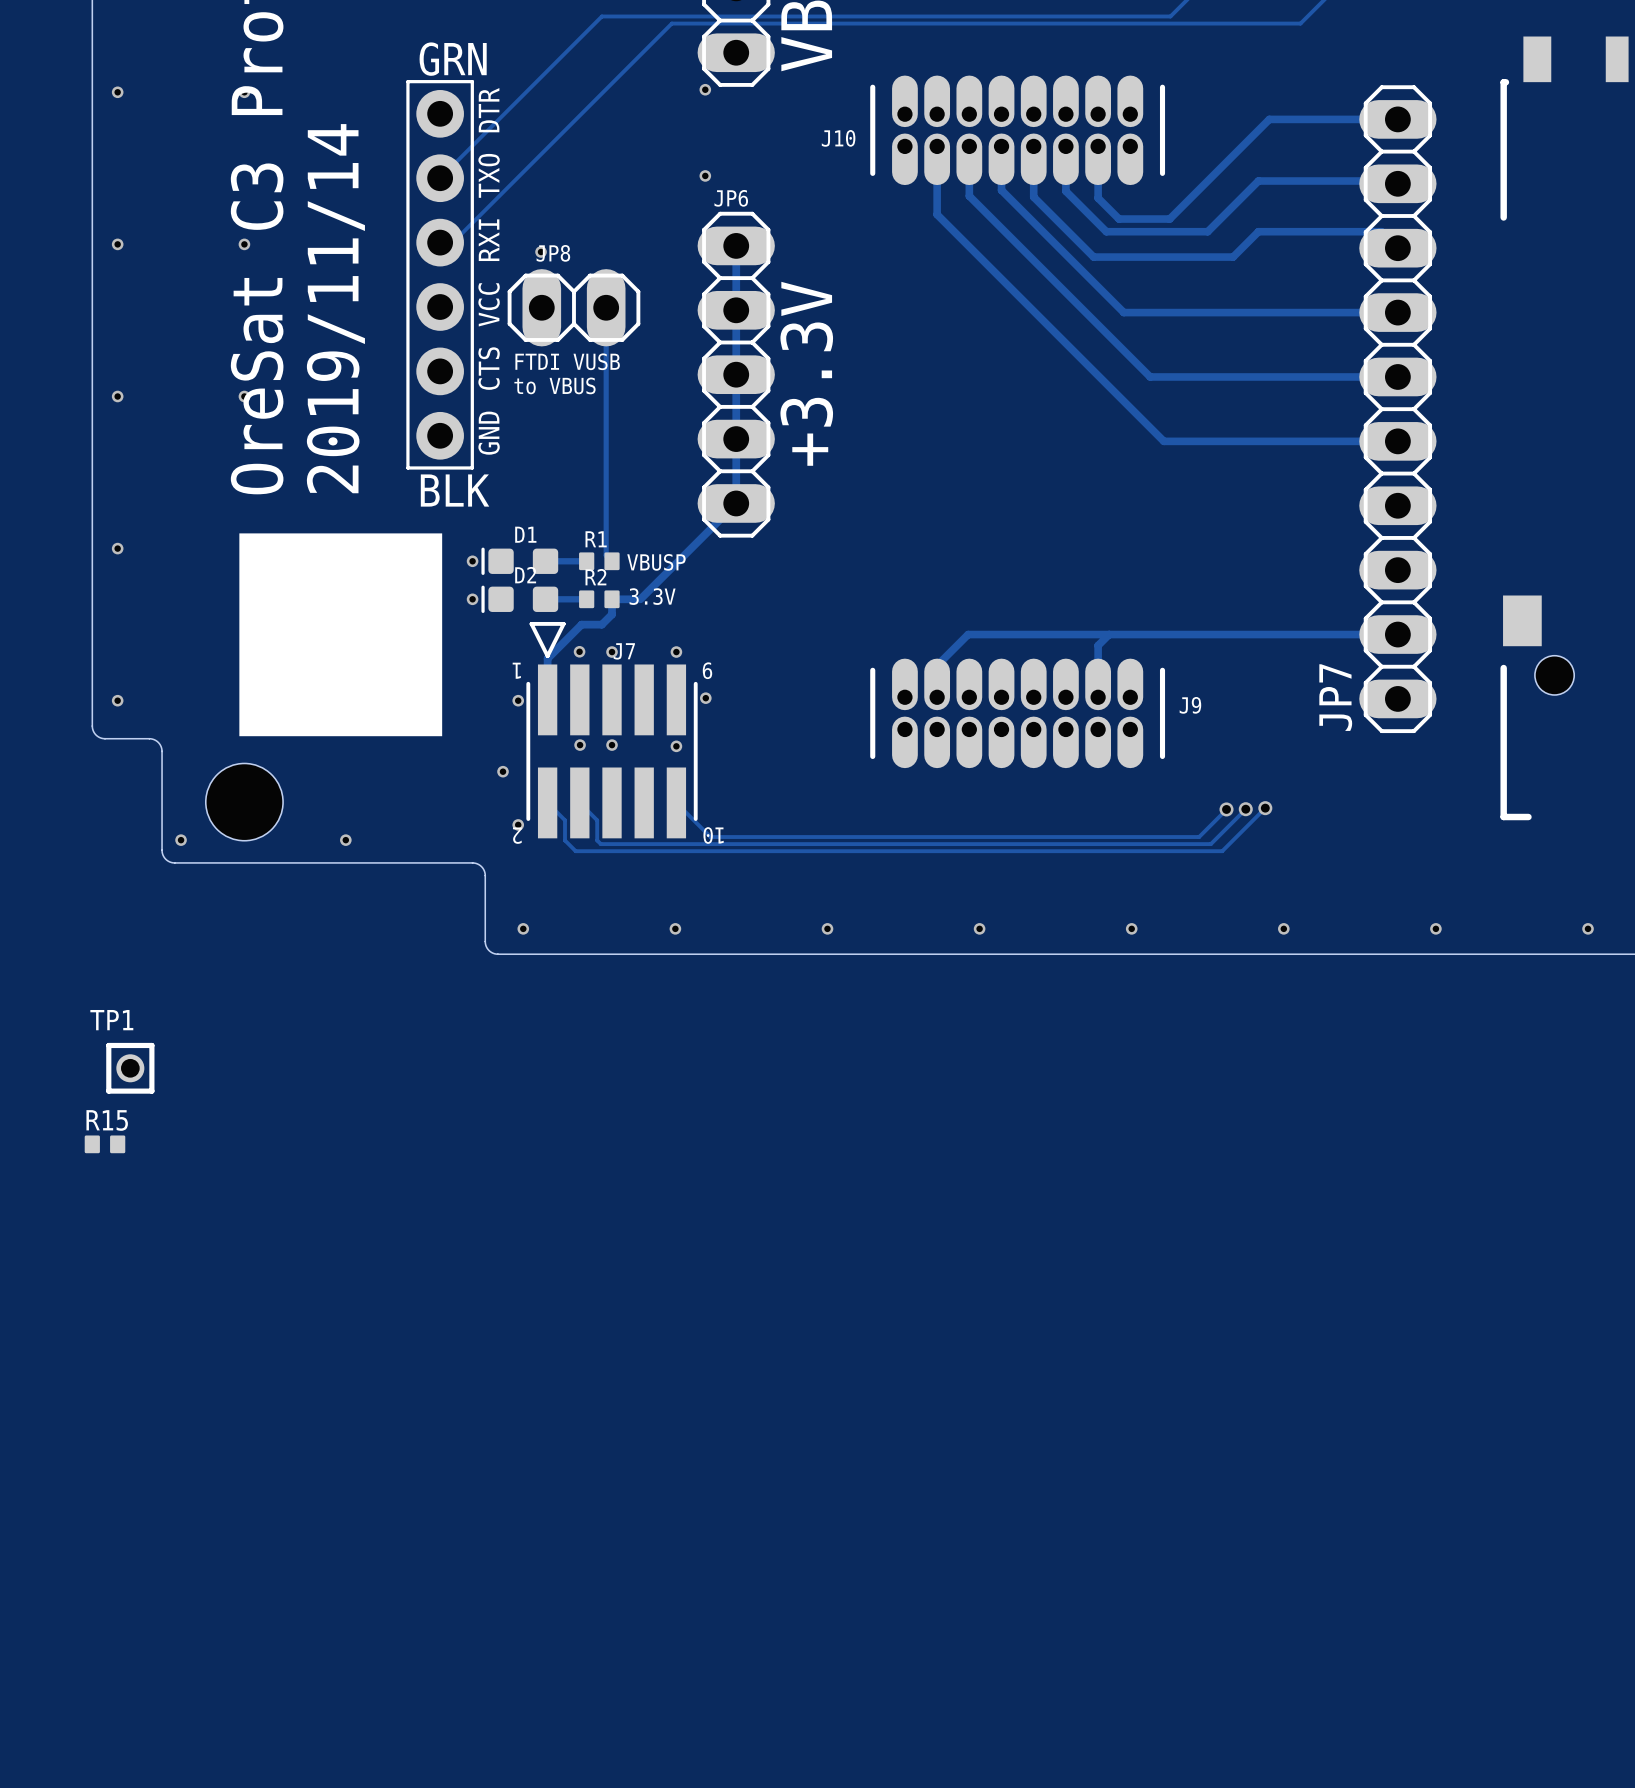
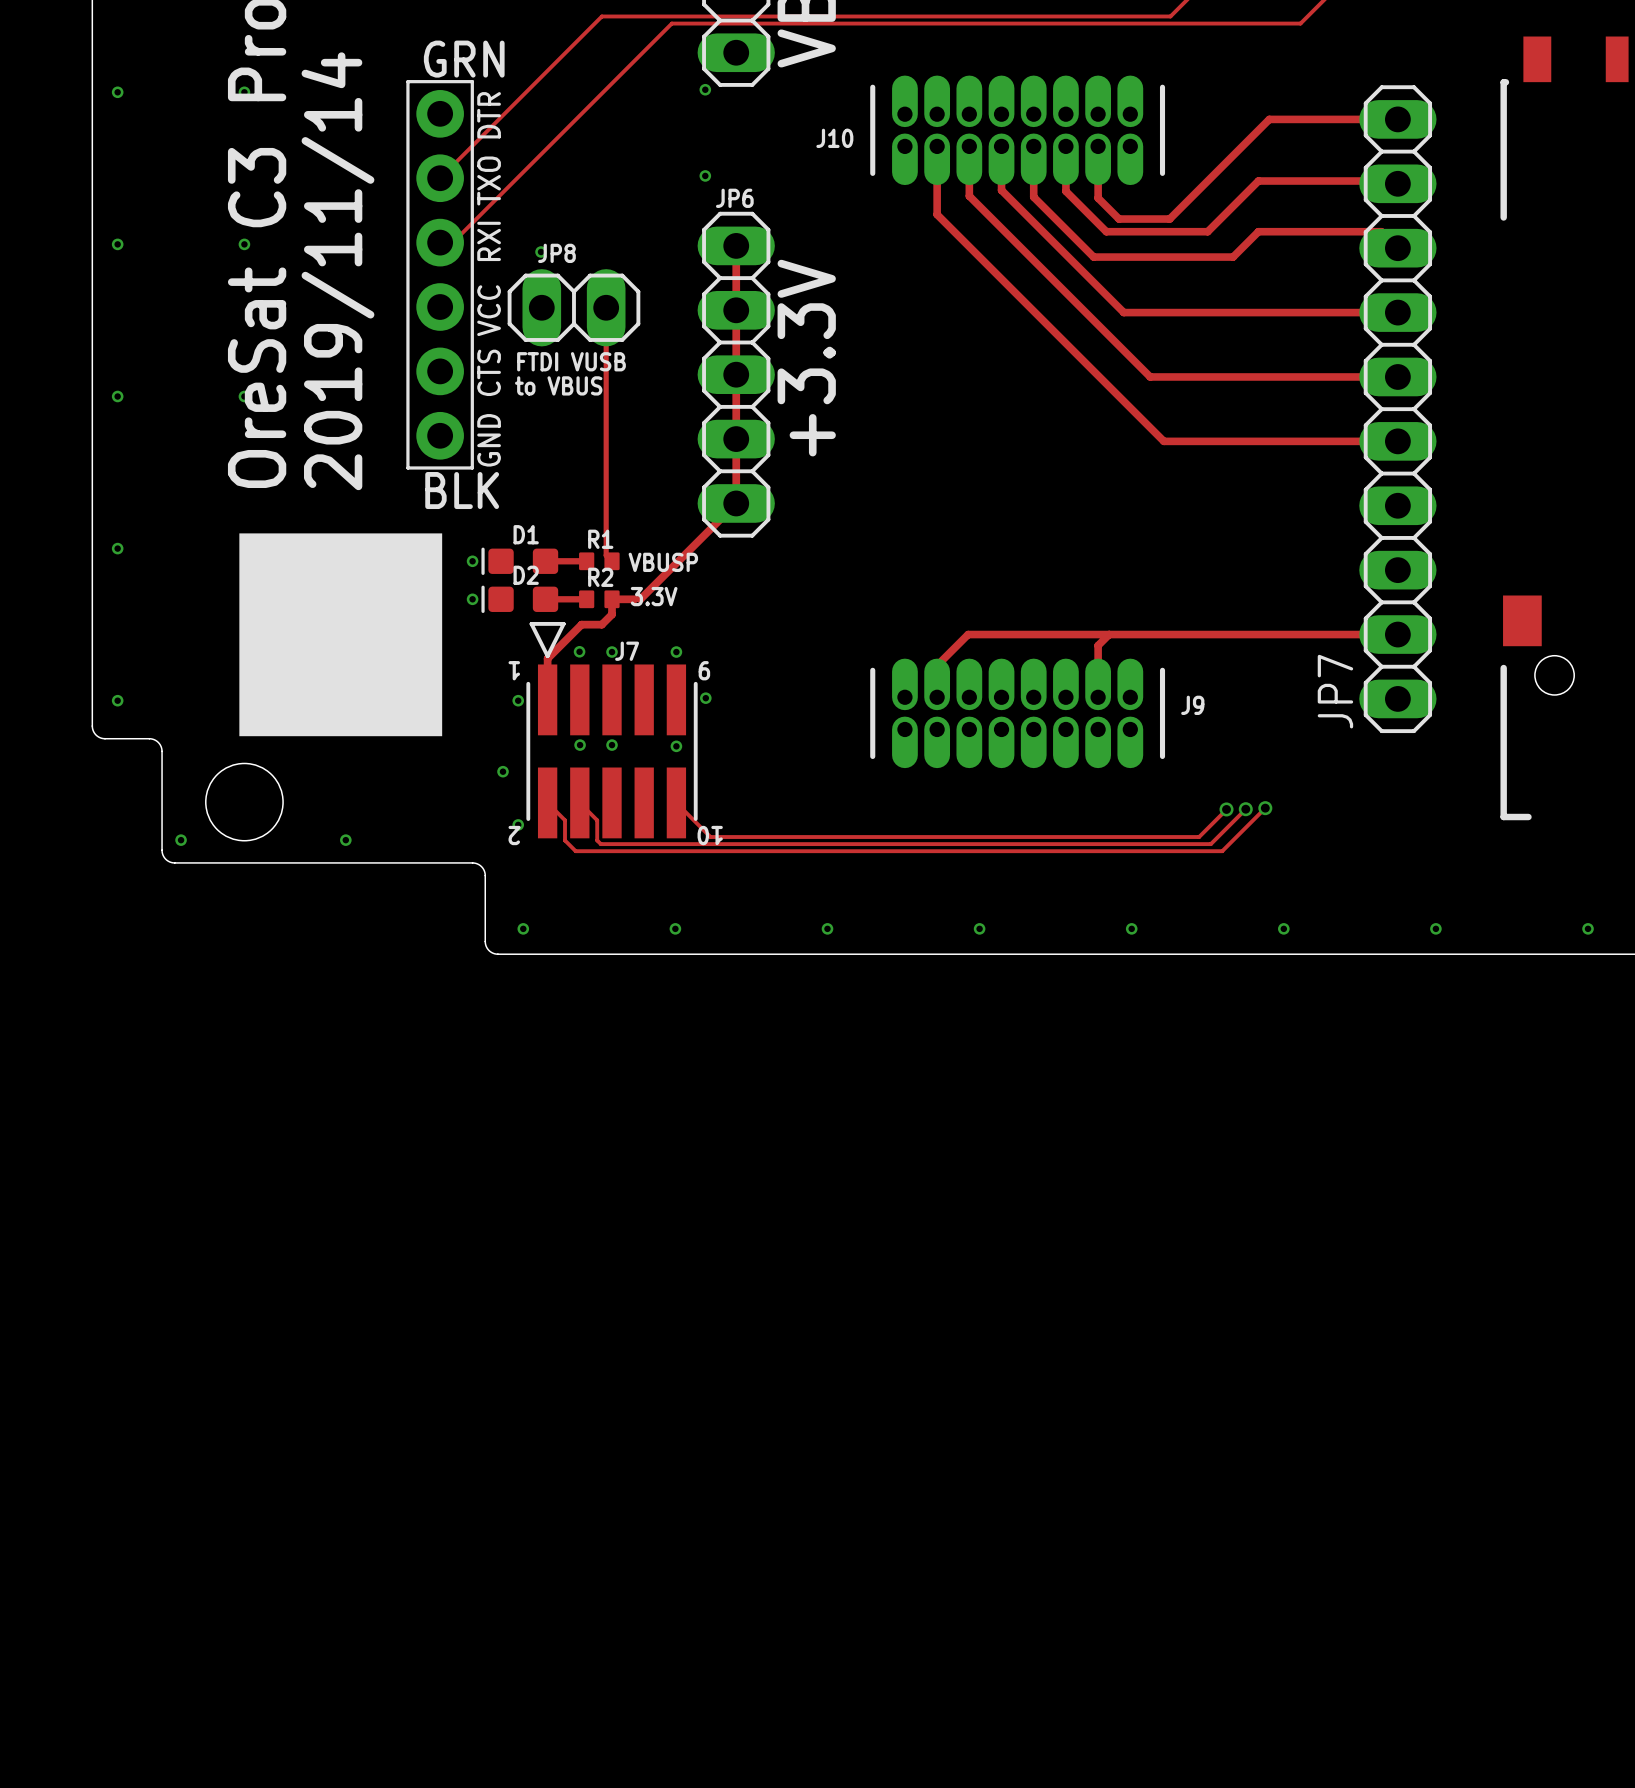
TP1: (130, 1068) -> none
R15: (104, 1144) -> none

